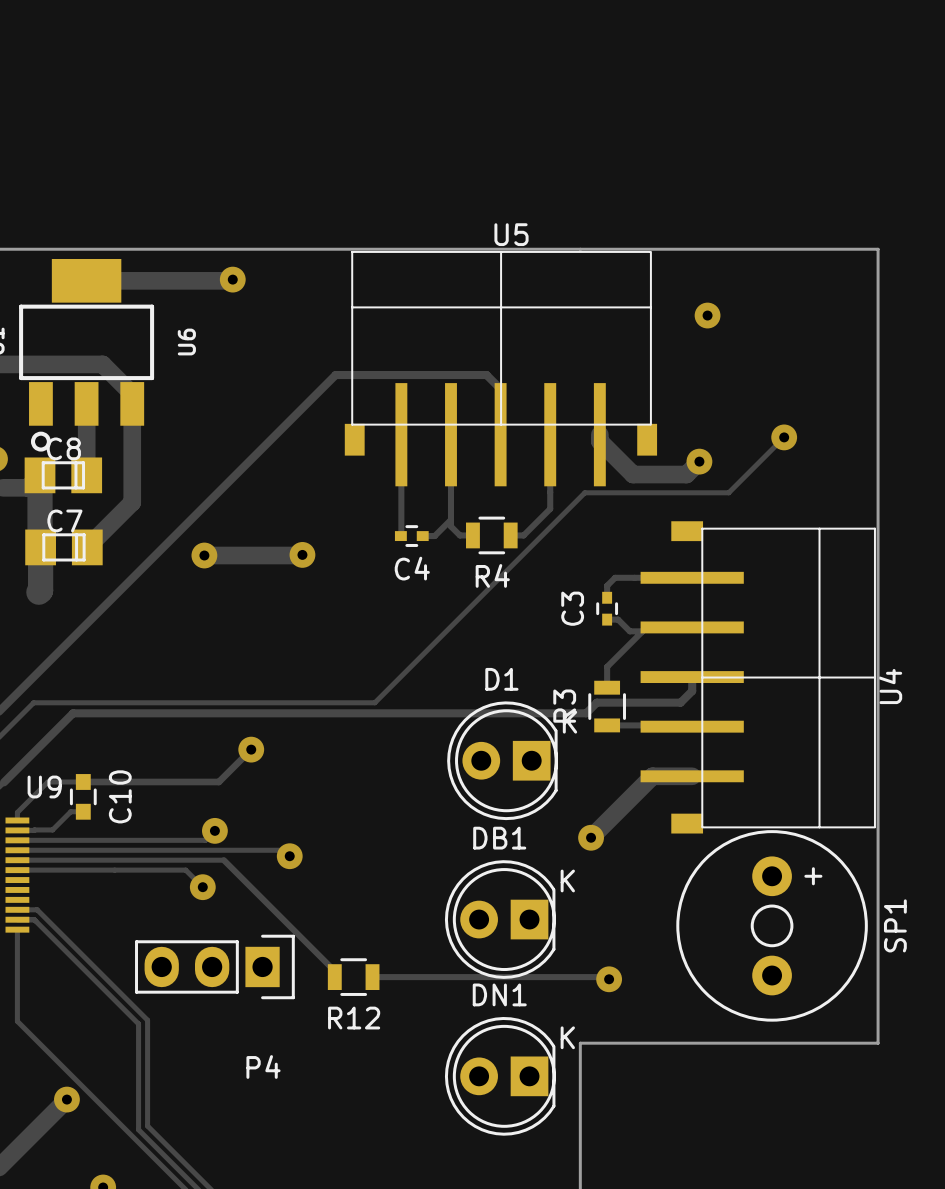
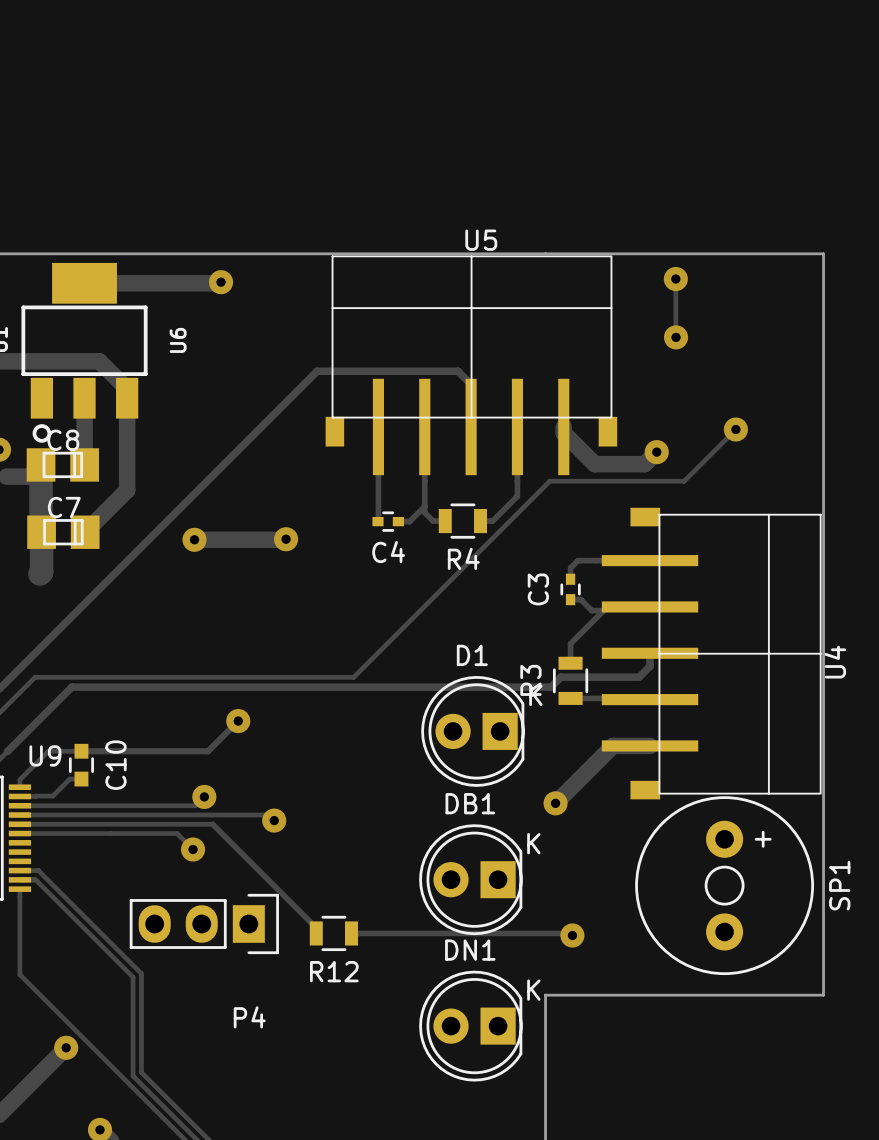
track: none -> (675, 279) (675, 337)
via: none -> (675, 279)
via: (707, 315) -> none
via: none -> (676, 337)

